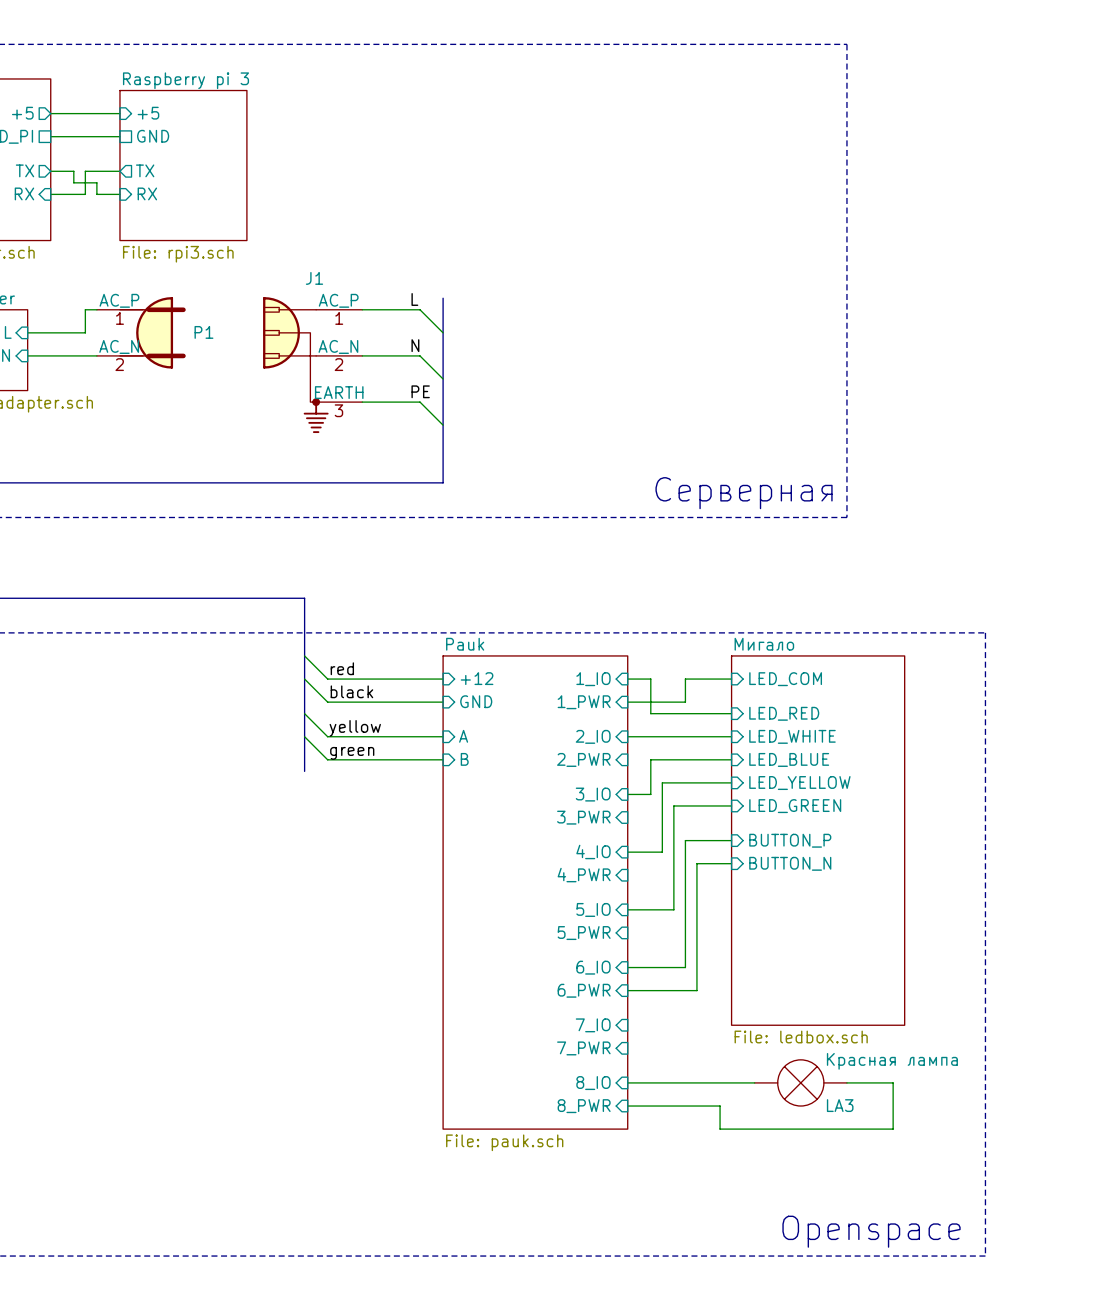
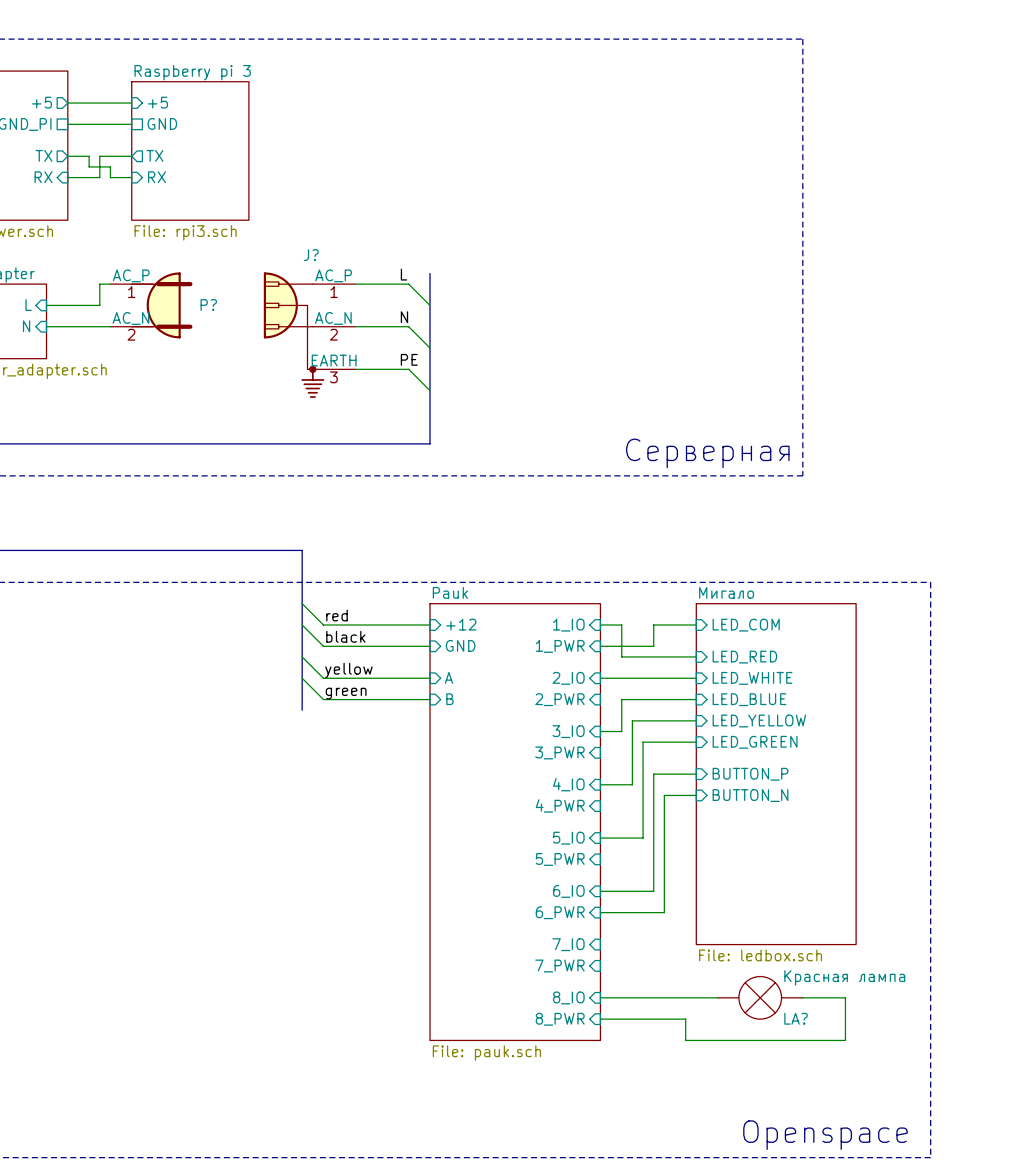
J1 name: J1 (314, 278) -> J? (311, 255)
P1 name: P1 (203, 332) -> P? (208, 305)
LA3 name: LA3 (840, 1105) -> LA? (796, 1018)

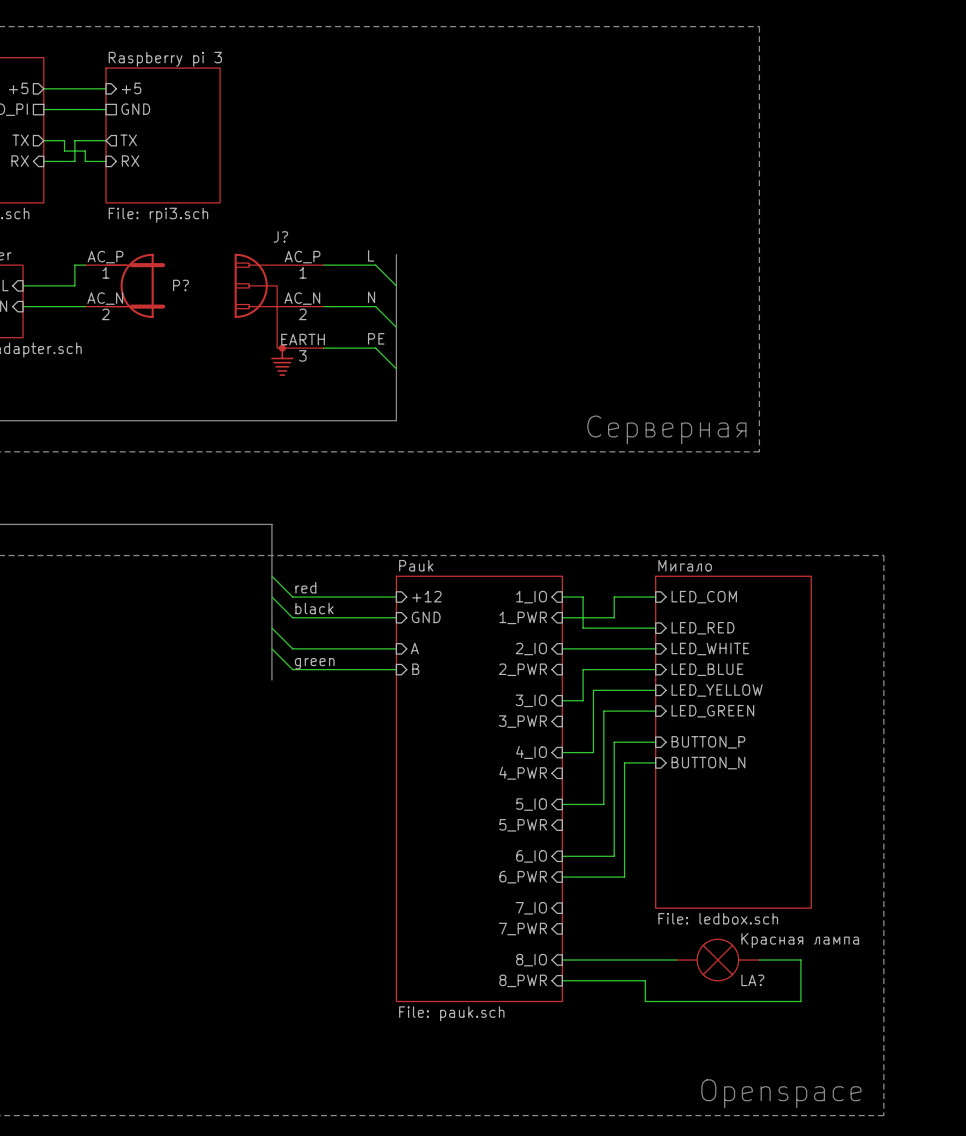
label: yellow (348, 670) -> none

